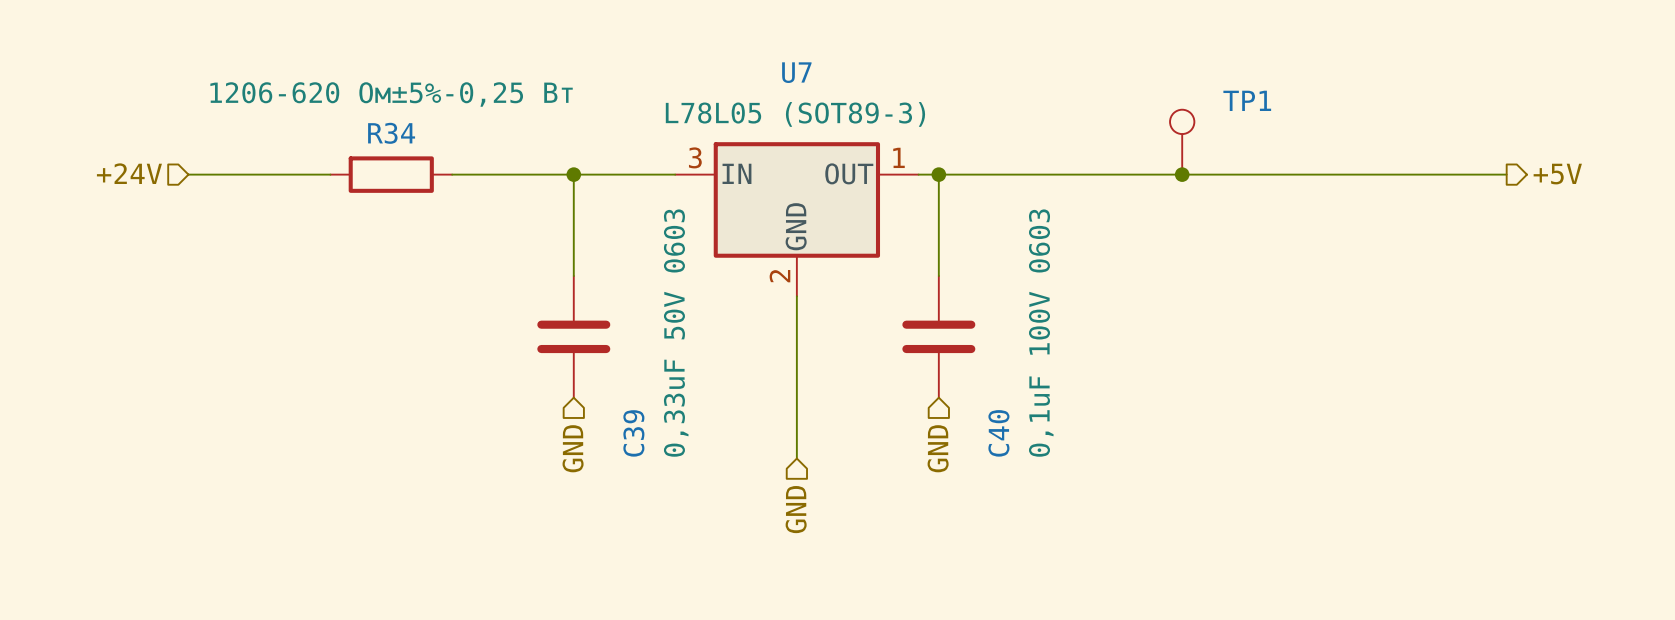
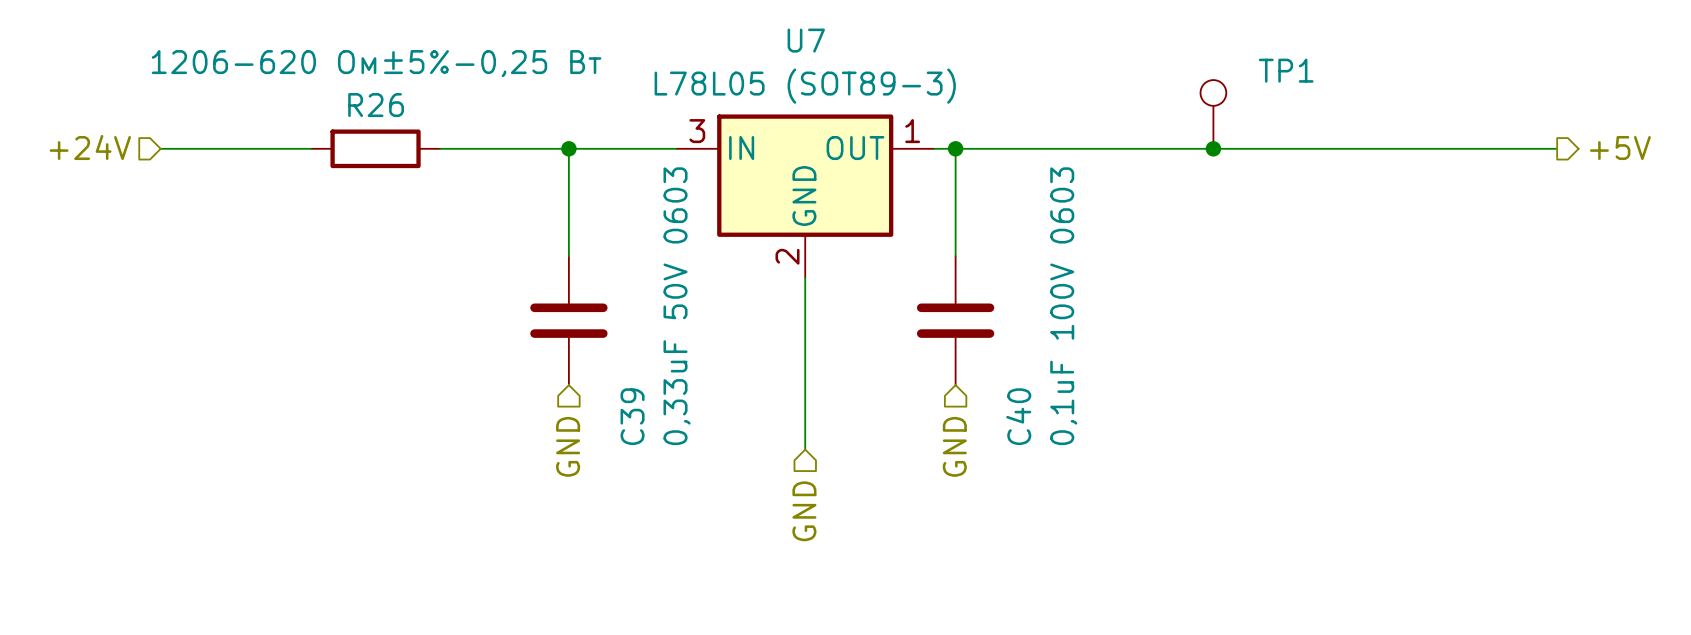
R34 name: R34 (391, 133) -> R26 (376, 105)

